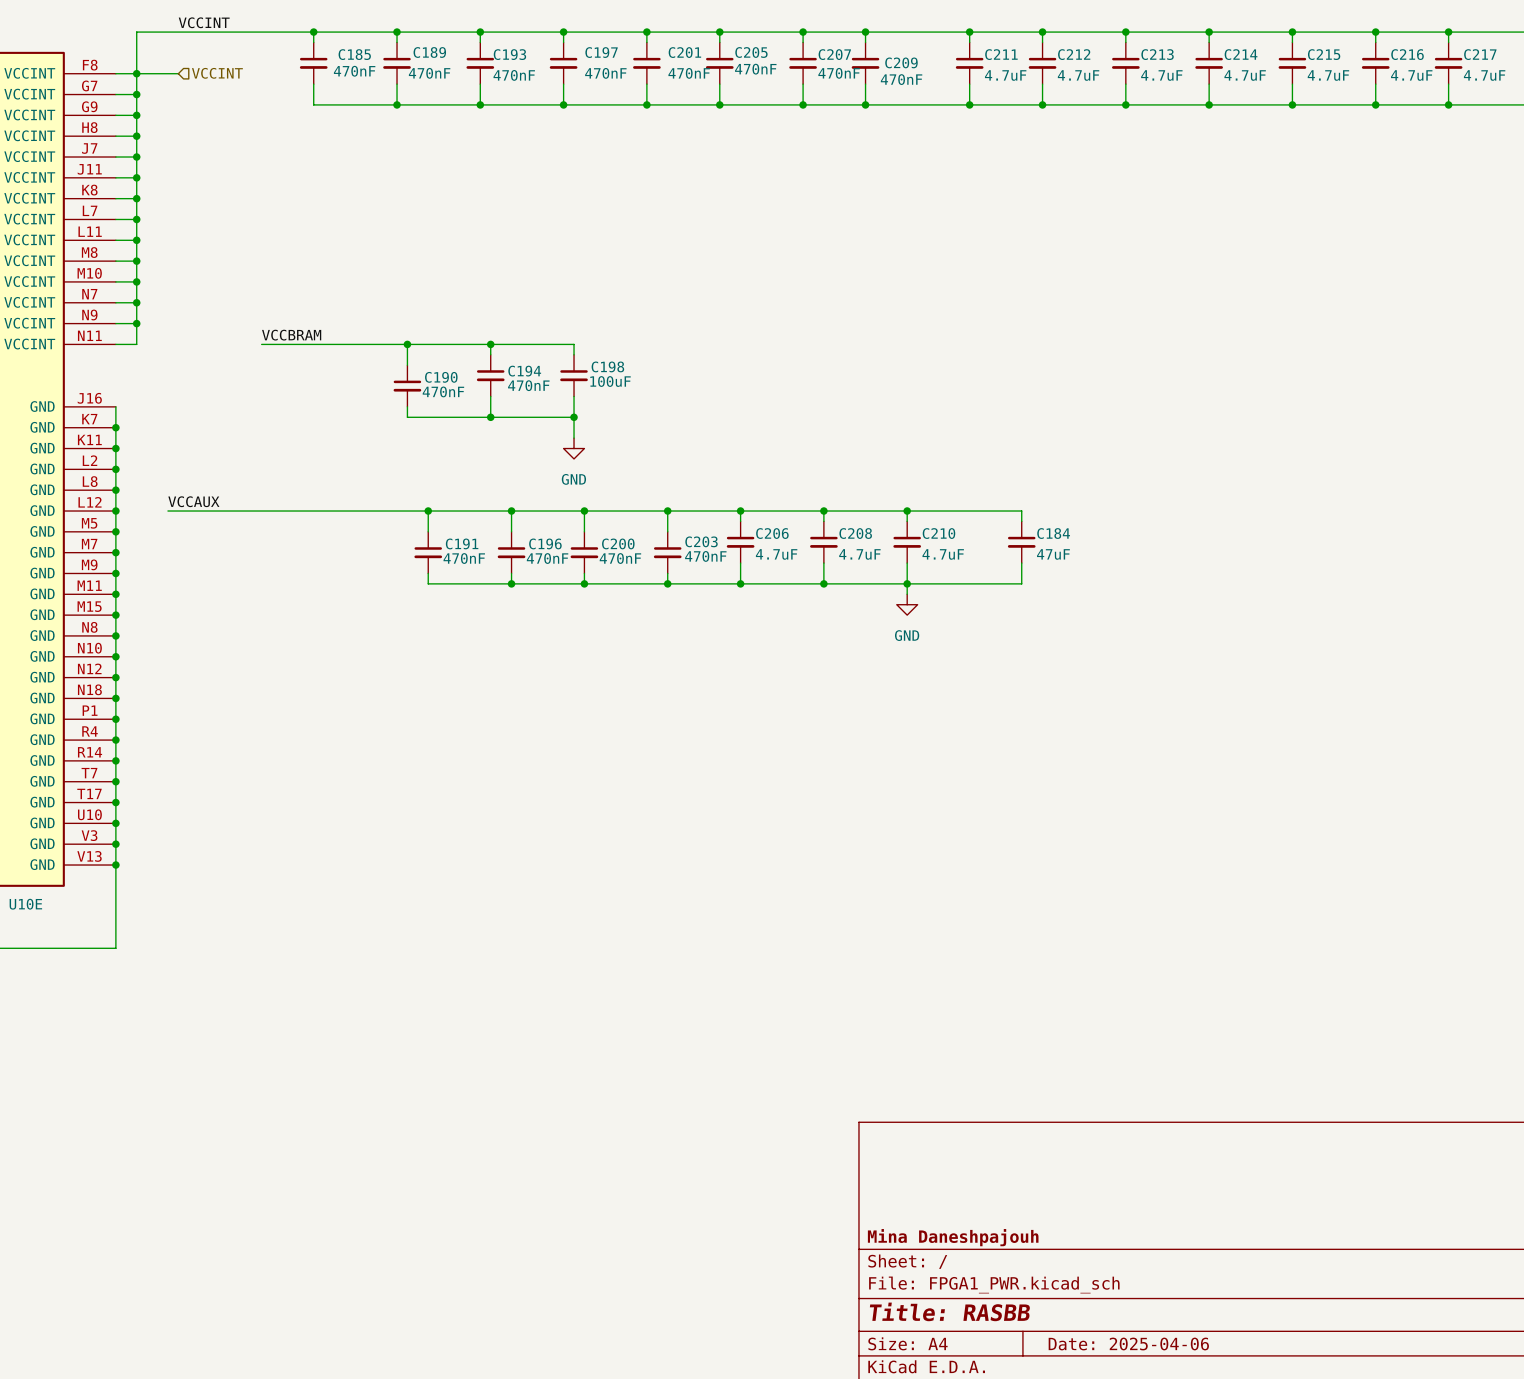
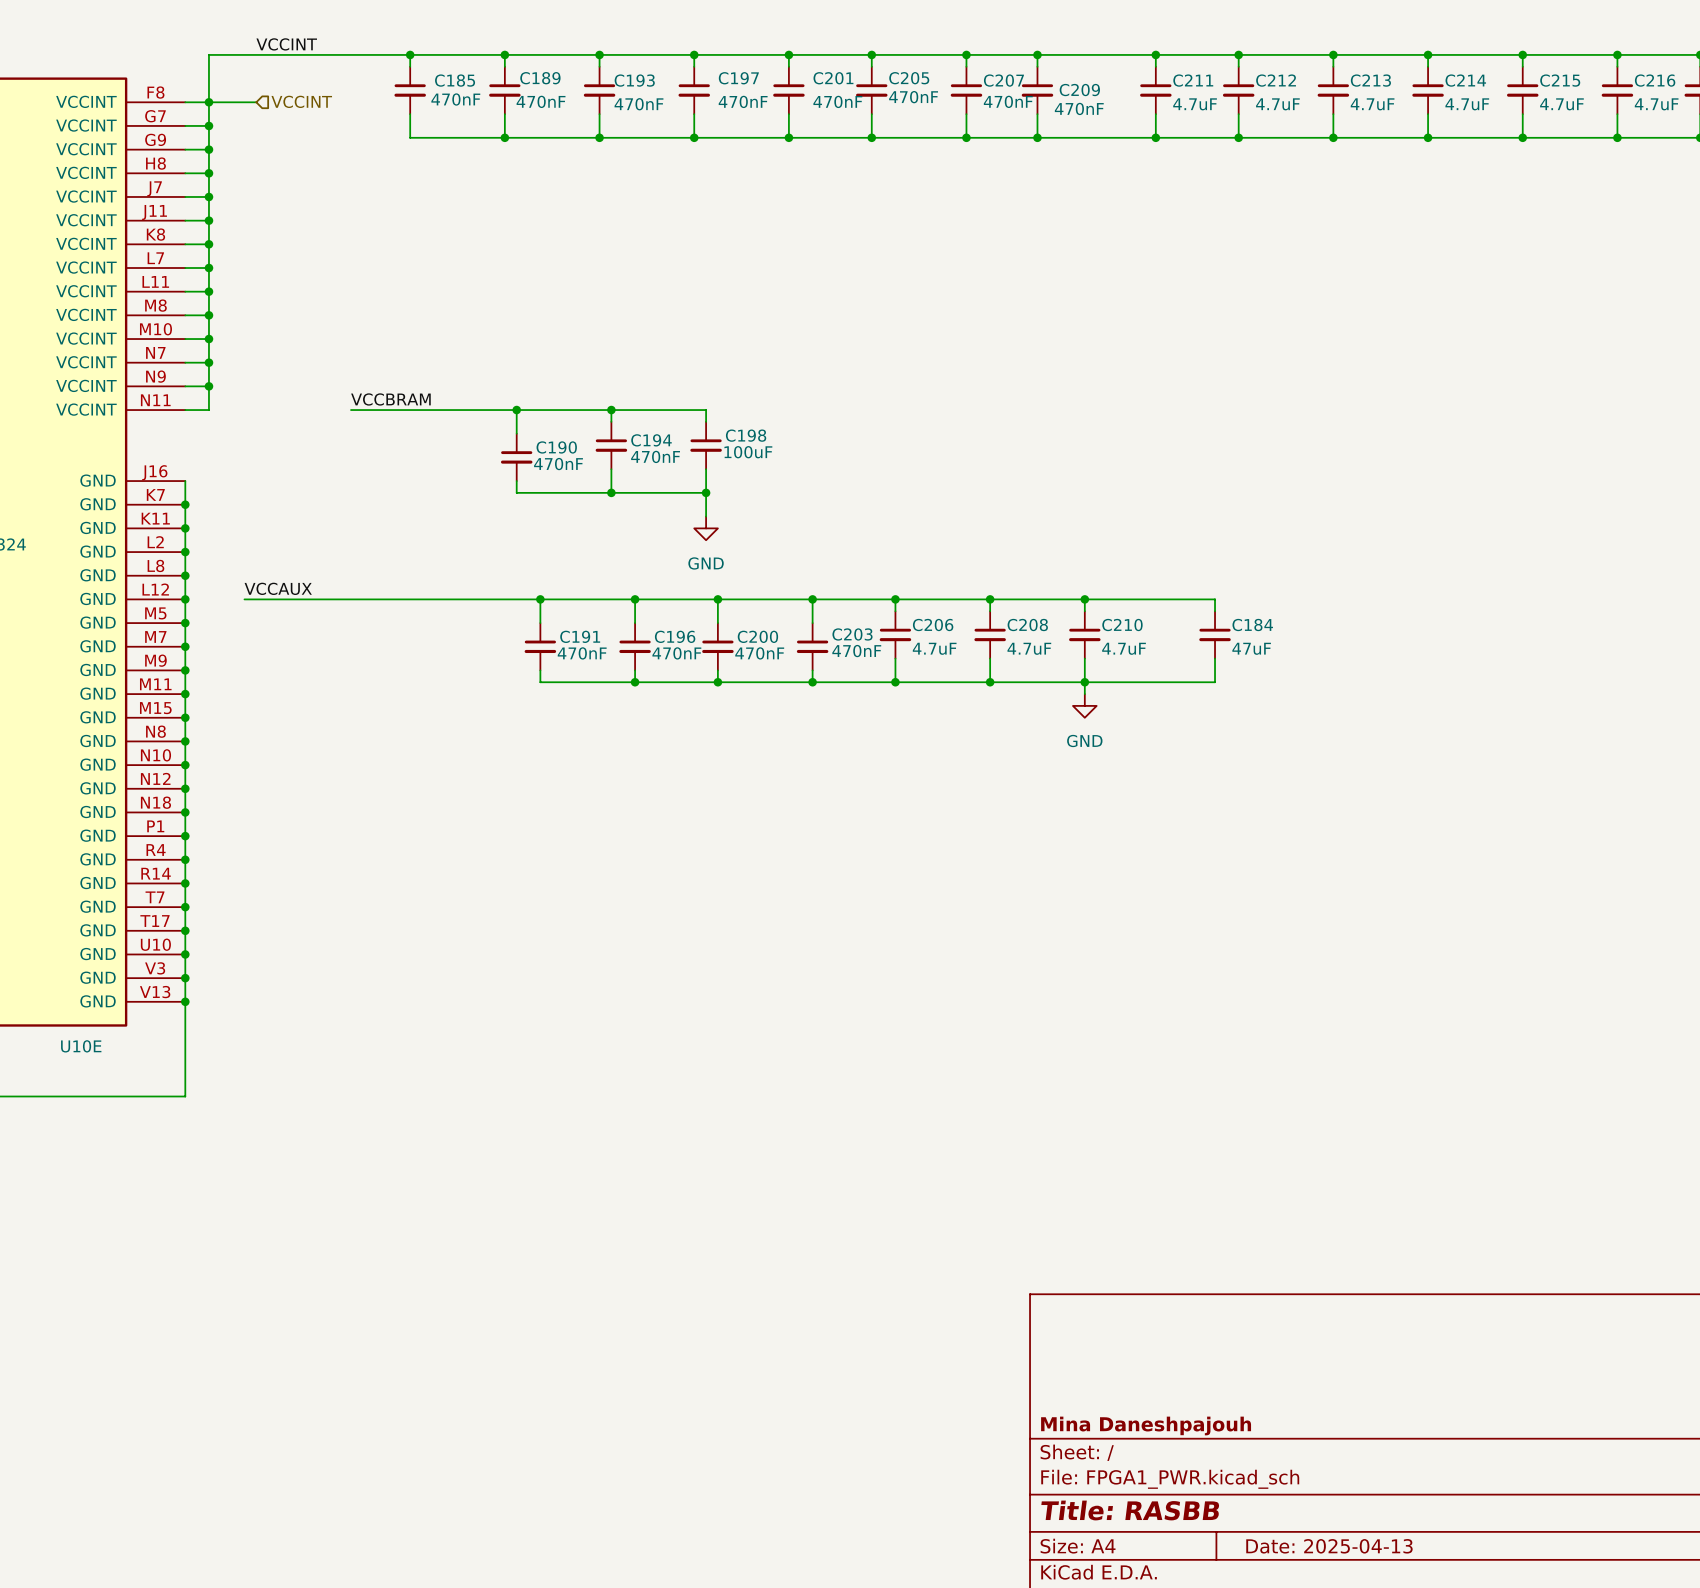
title block: Date: 2025-04-06 (1128, 1343) -> Date: 2025-04-13 (1329, 1546)

